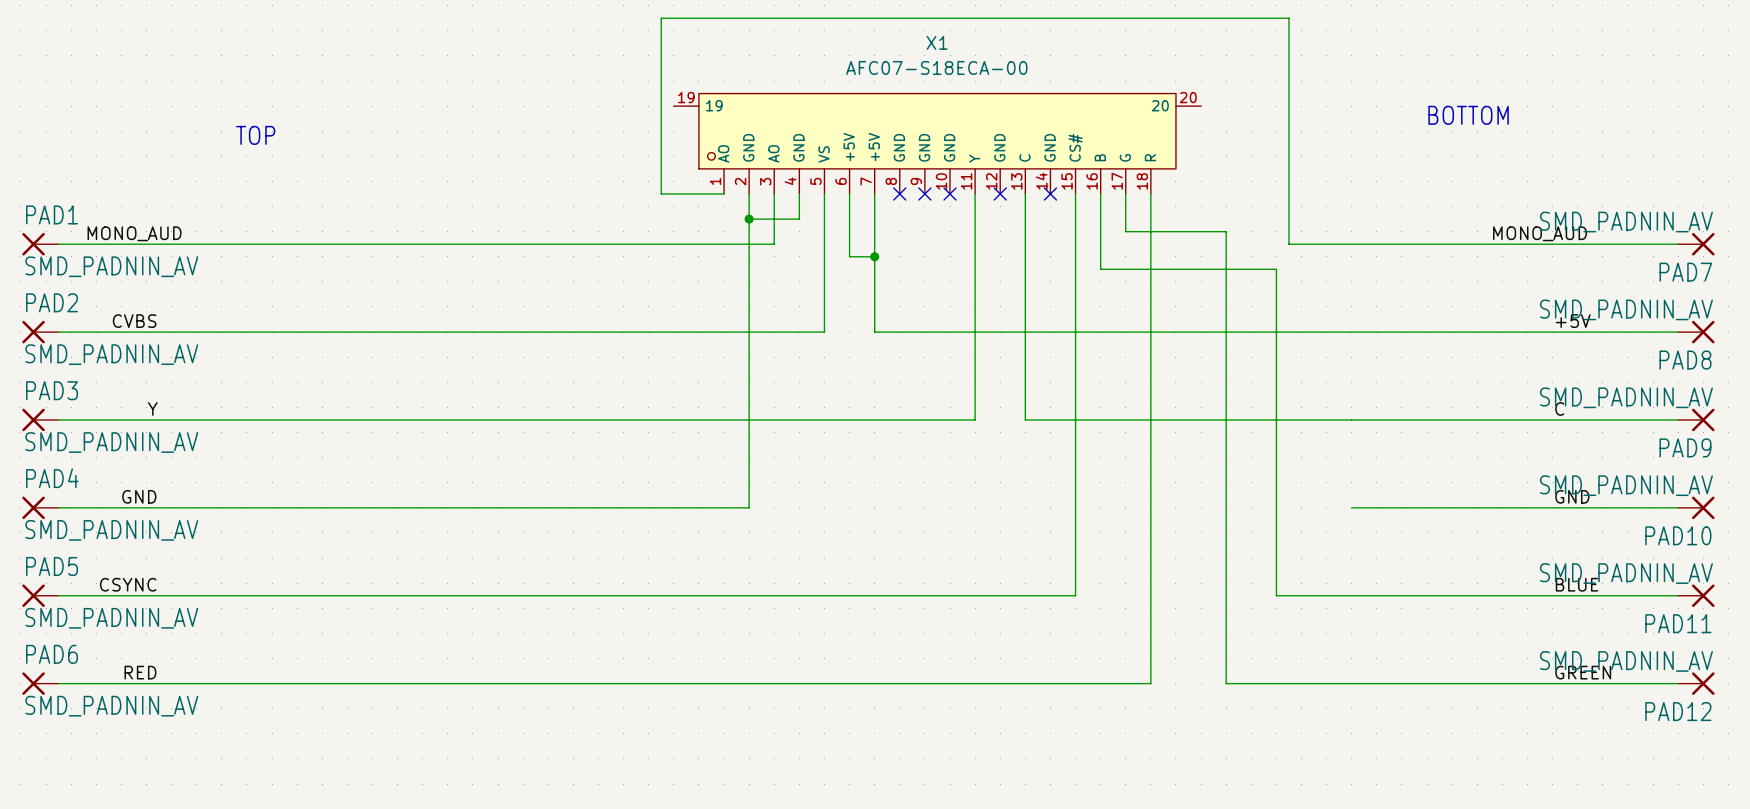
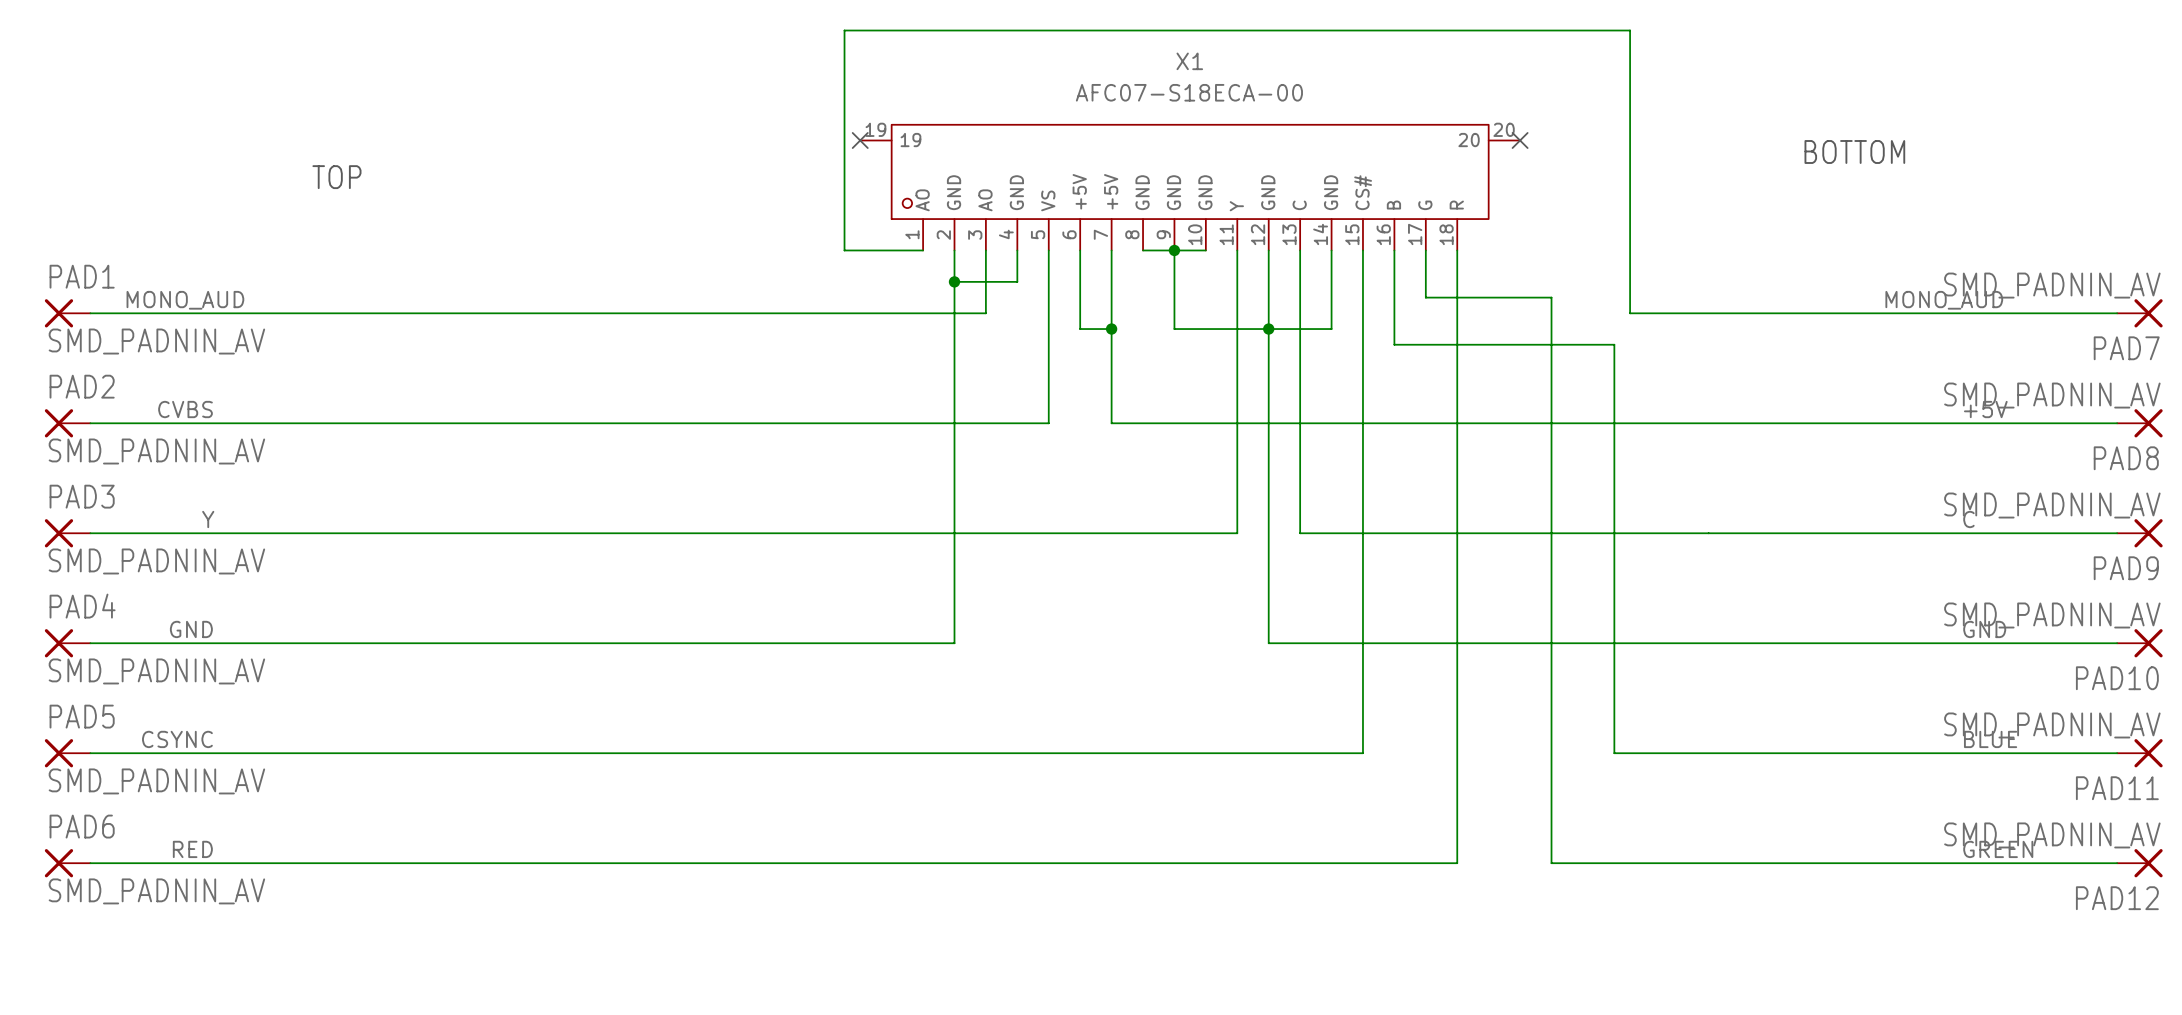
no-connect mark: none -> (860, 140)
no-connect mark: none -> (1520, 140)
wire: none -> (1143, 250) (1205, 250)
no-connect mark: (899, 194) -> none
wire: none -> (1174, 250) (1174, 329) (1331, 329) (1331, 250)
no-connect mark: (924, 194) -> none
junction: none -> (1174, 250)
no-connect mark: (950, 194) -> none
wire: none -> (1268, 250) (1268, 643) (1708, 643)
no-connect mark: (1000, 194) -> none
no-connect mark: (1050, 194) -> none
junction: none -> (1268, 329)

